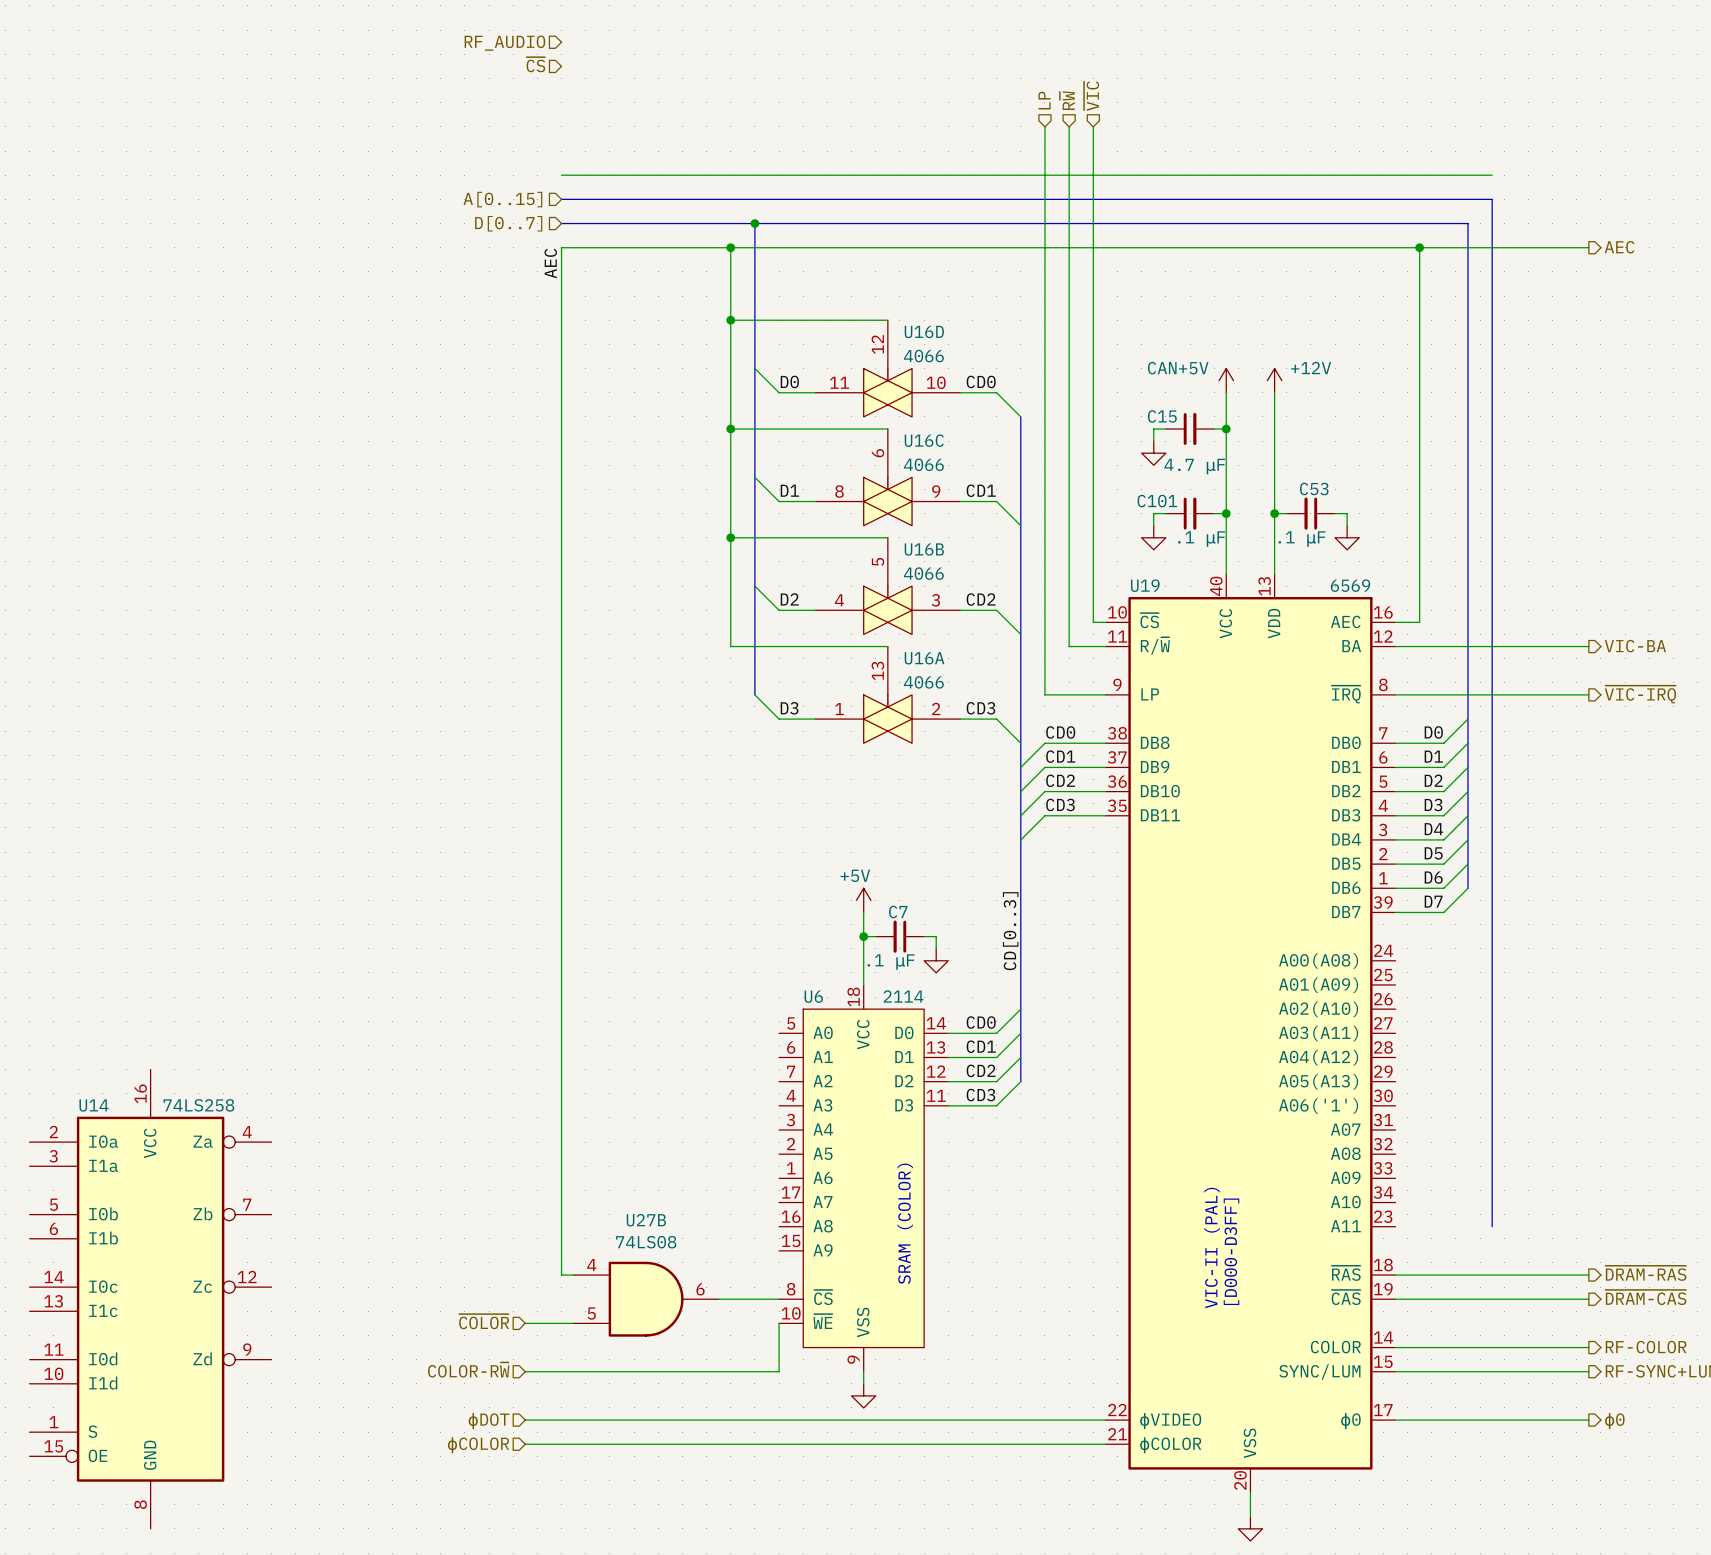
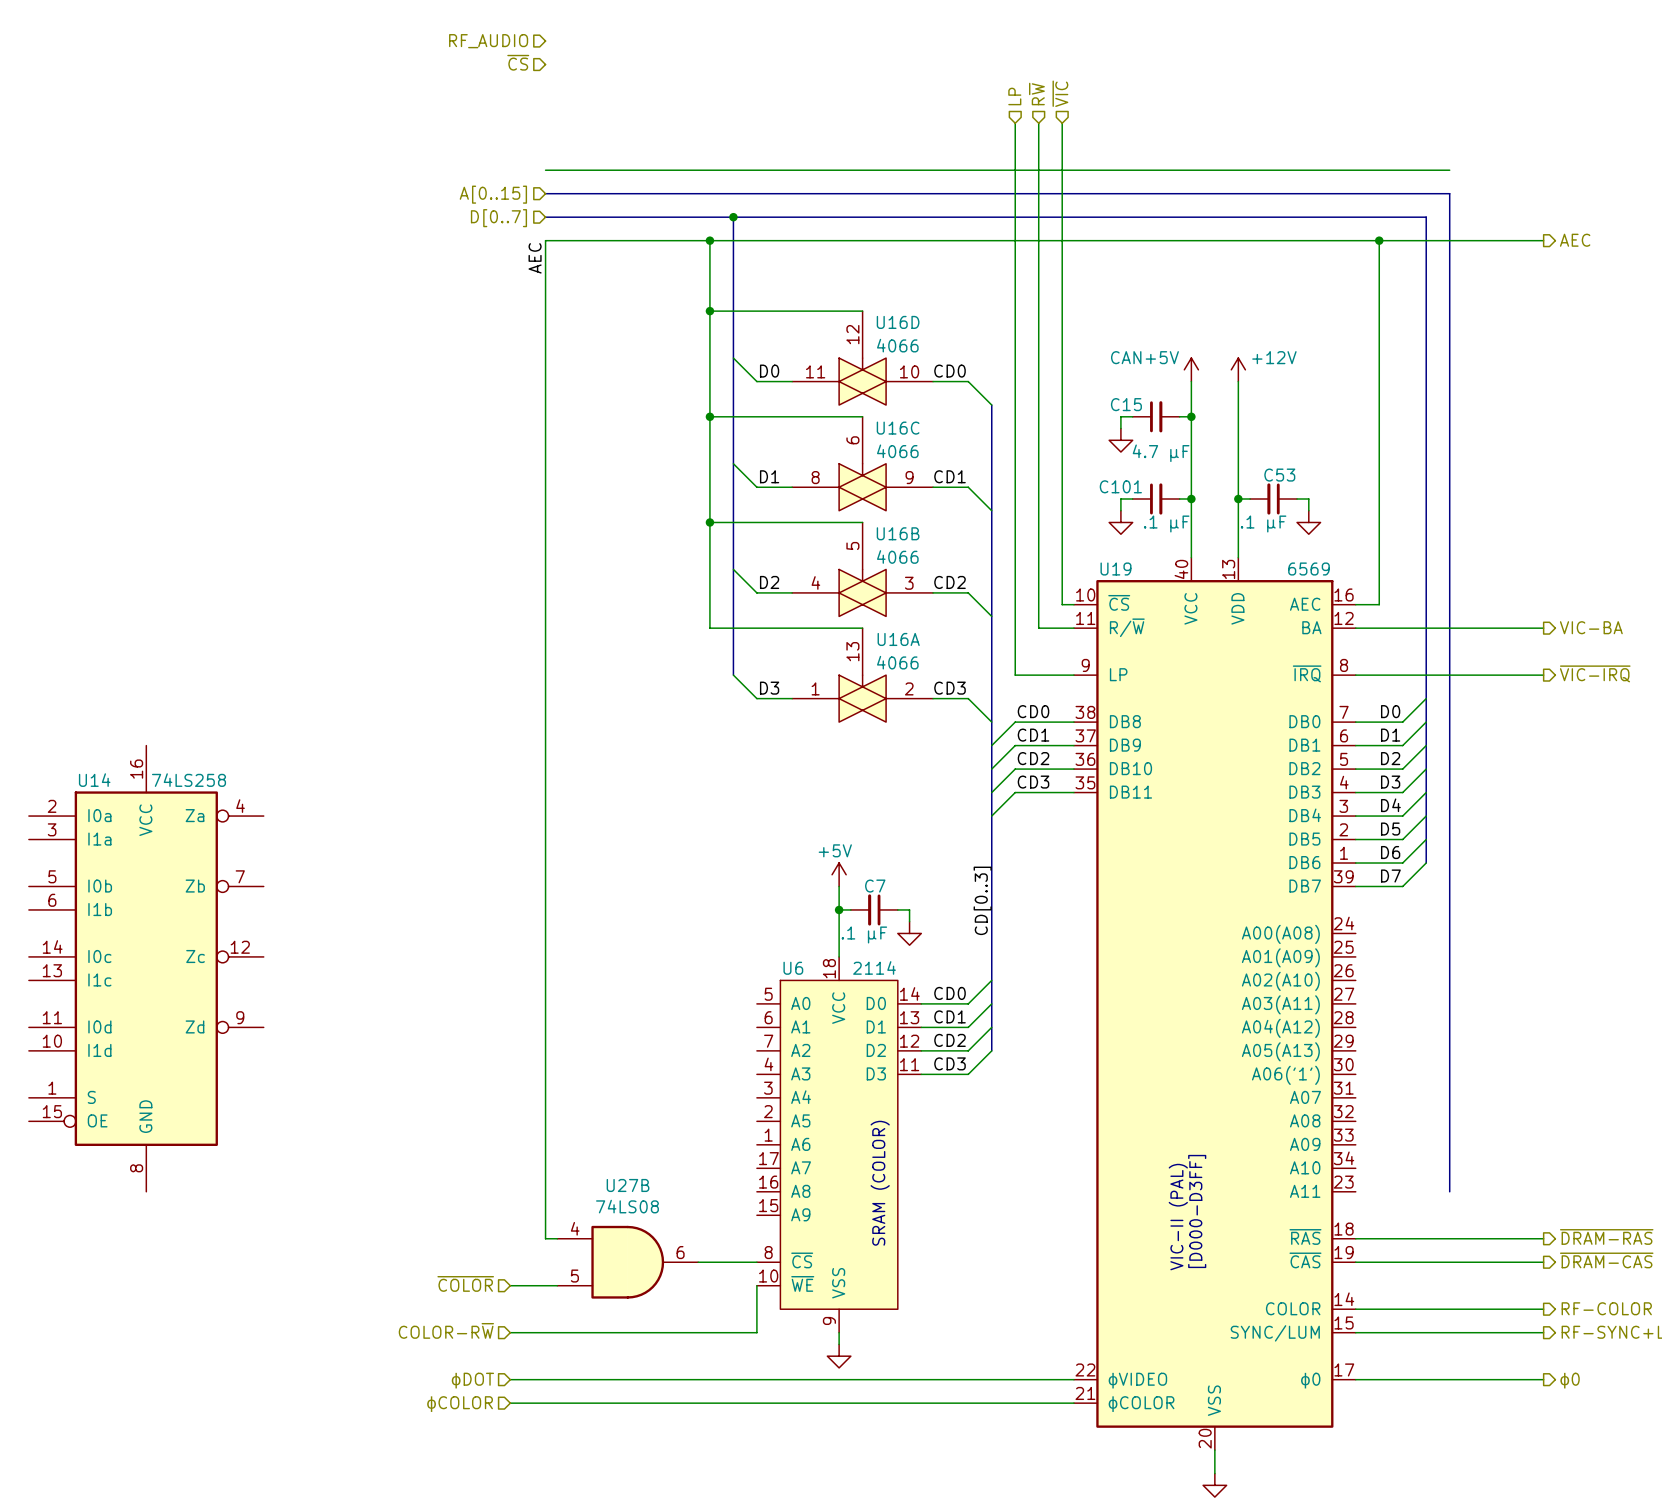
U14 position: (150, 1299) -> (146, 968)

